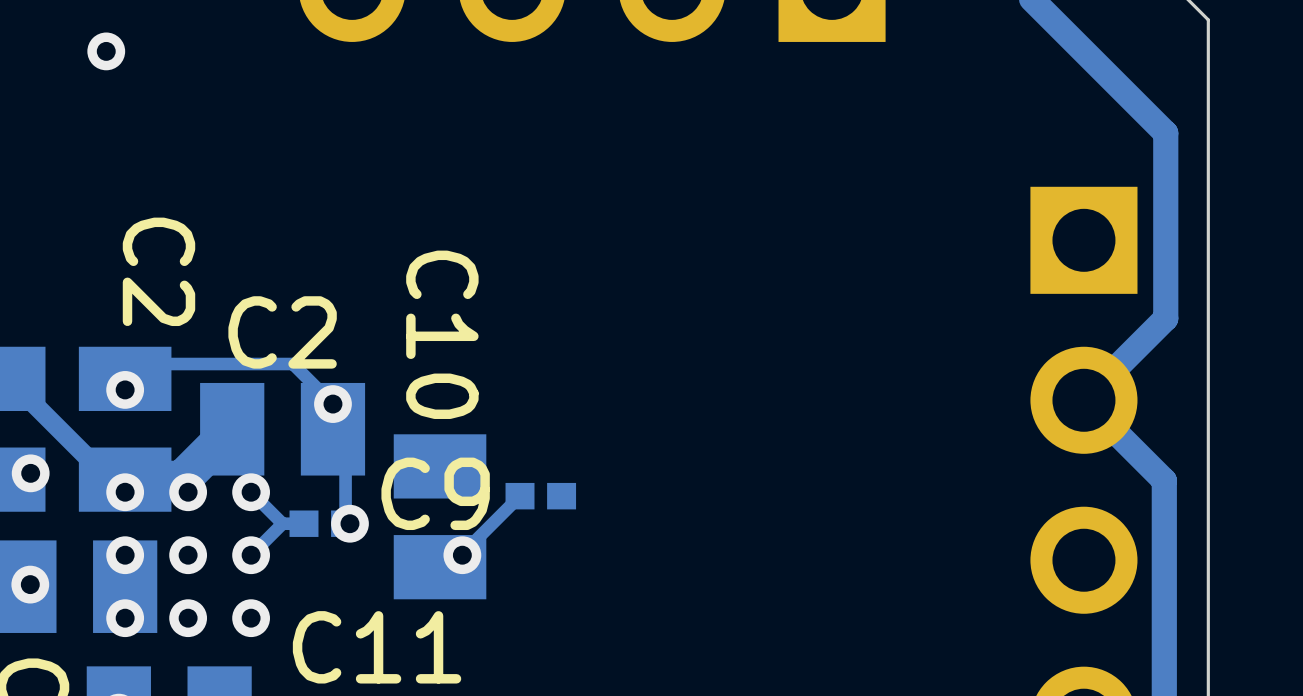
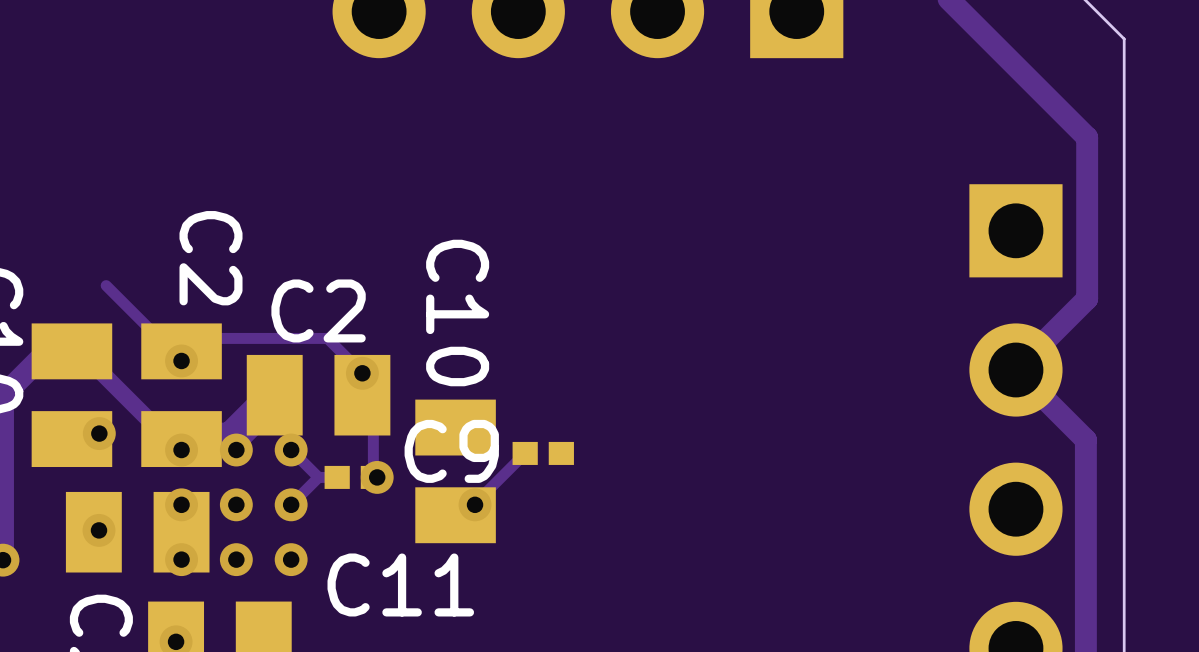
via: (106, 51) -> none
track: none -> (106, 285) (181, 360)

